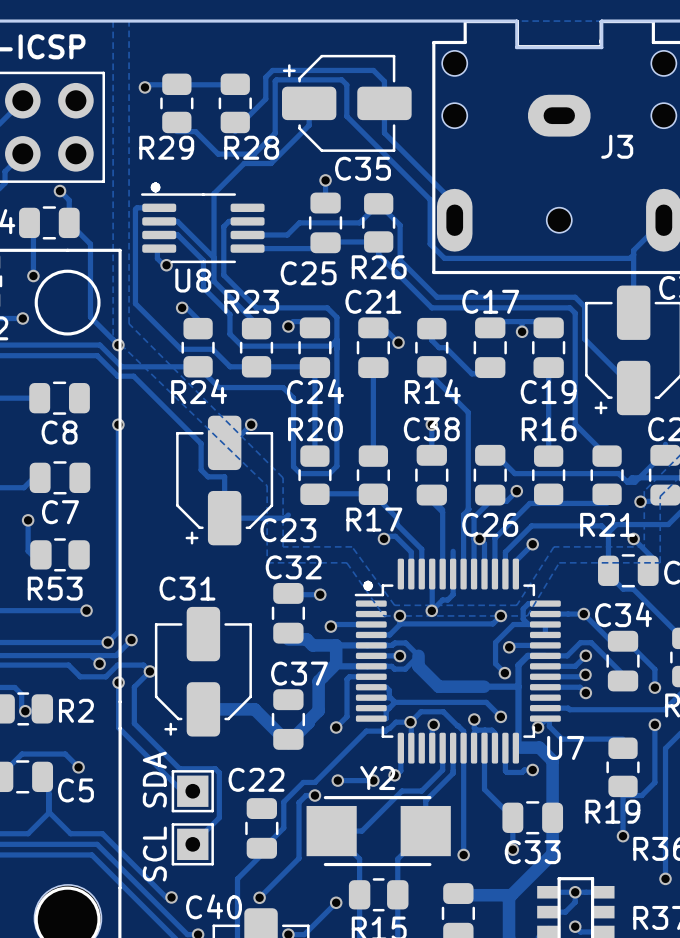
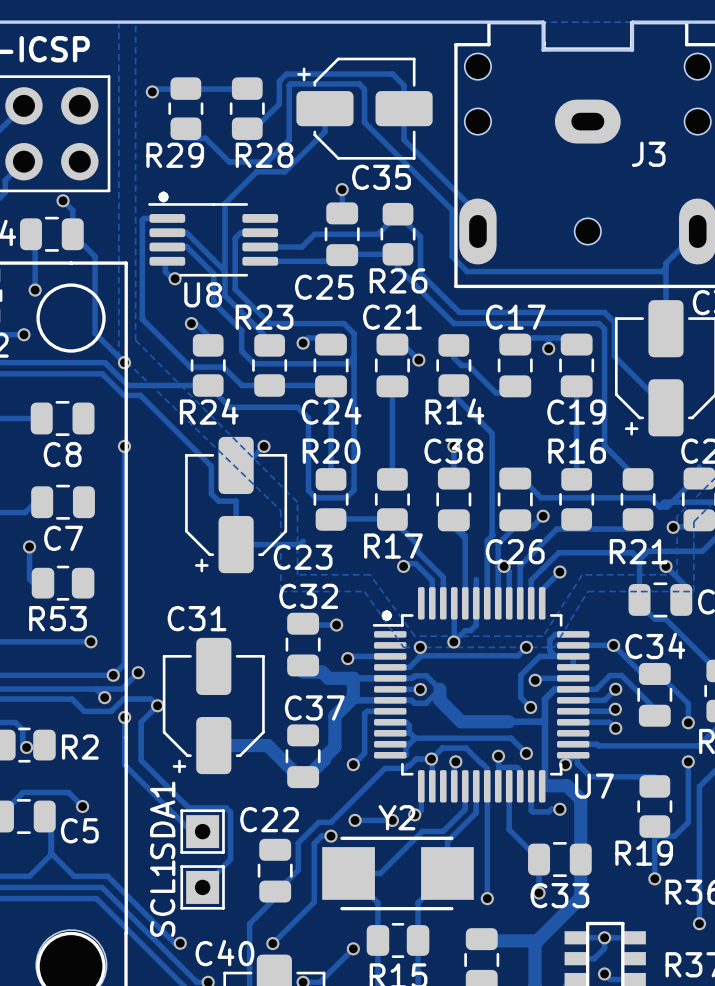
SDA name: SDA (154, 779) -> SDA1 (162, 820)
SCL name: SCL (154, 853) -> SCL1 (162, 898)

